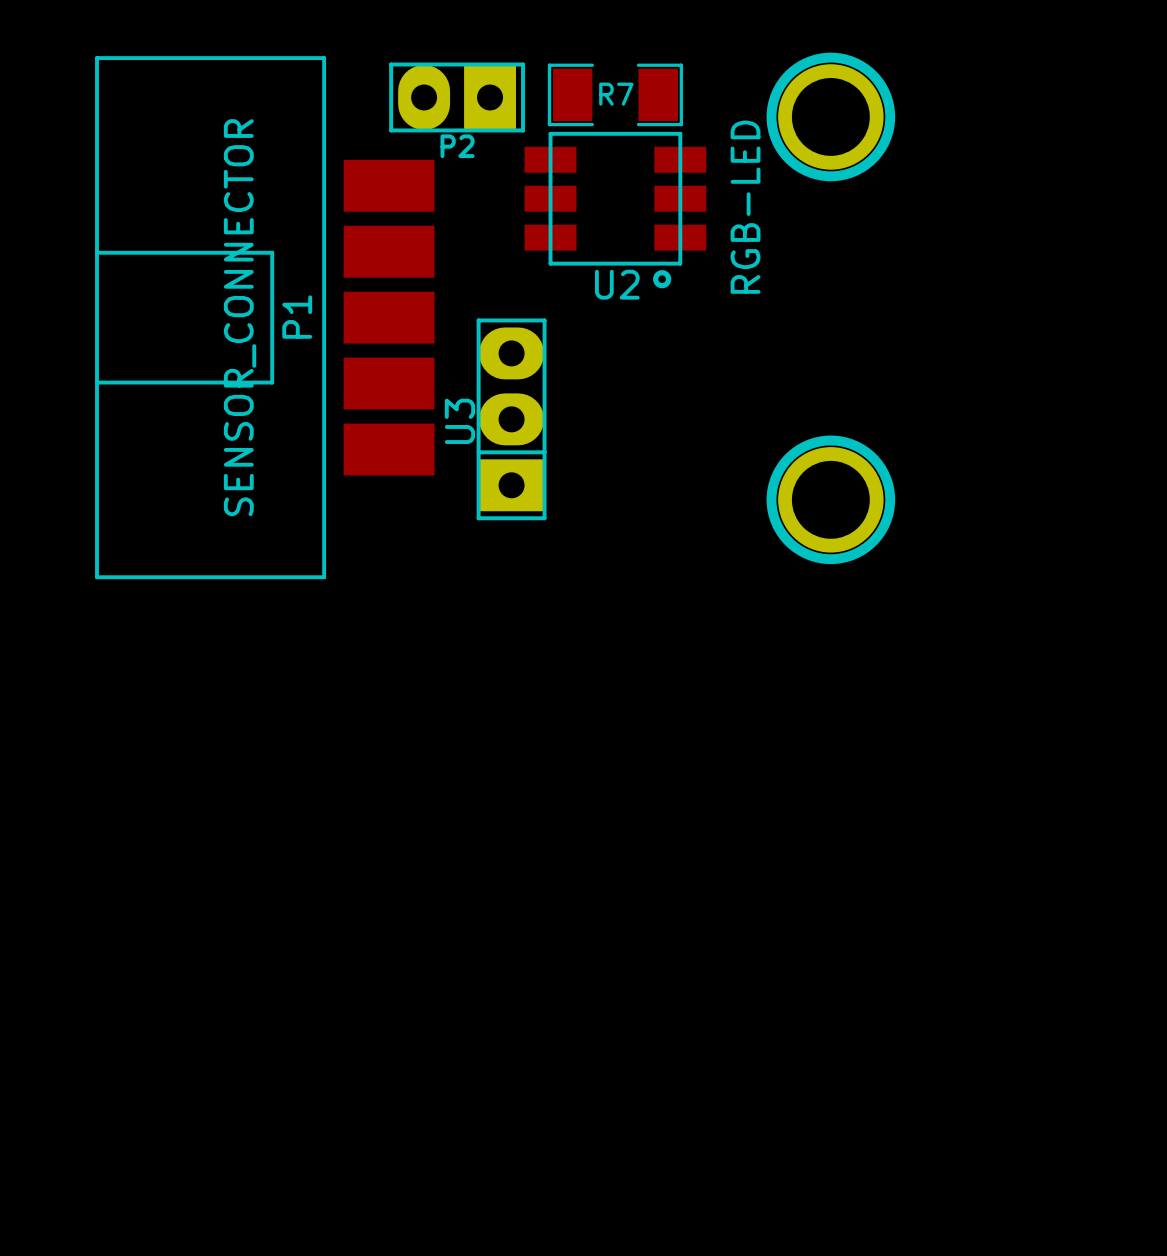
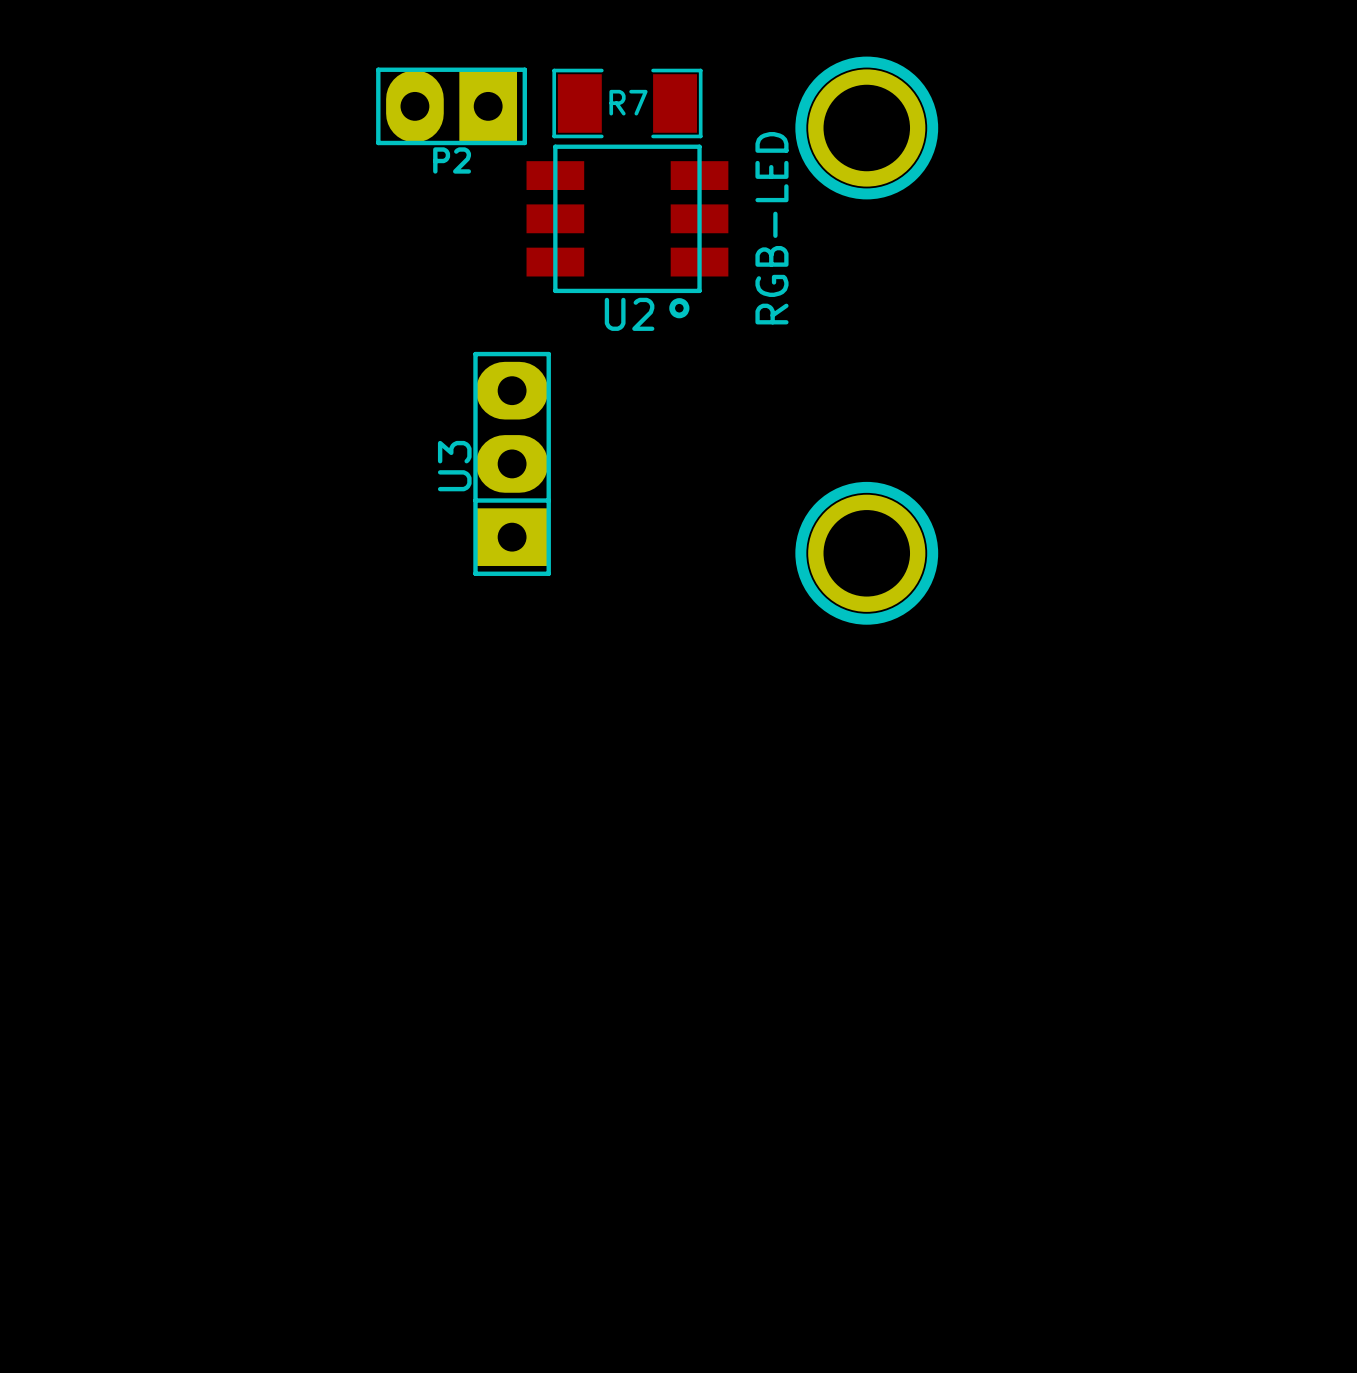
P1: SENSOR_CONNECTOR (264, 317) -> none

